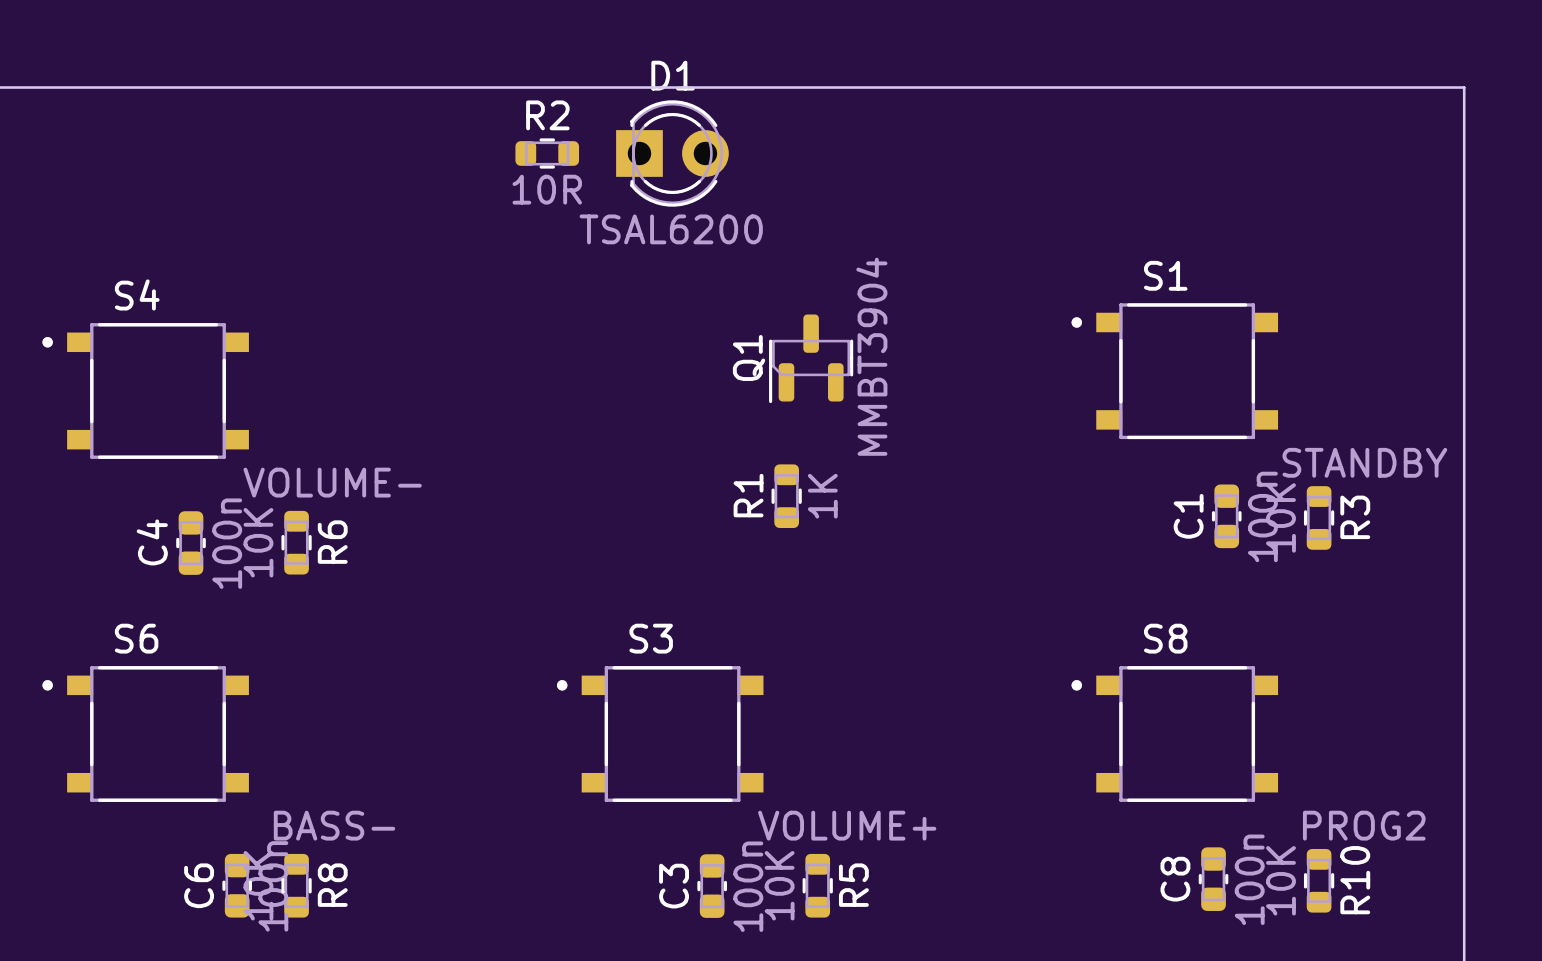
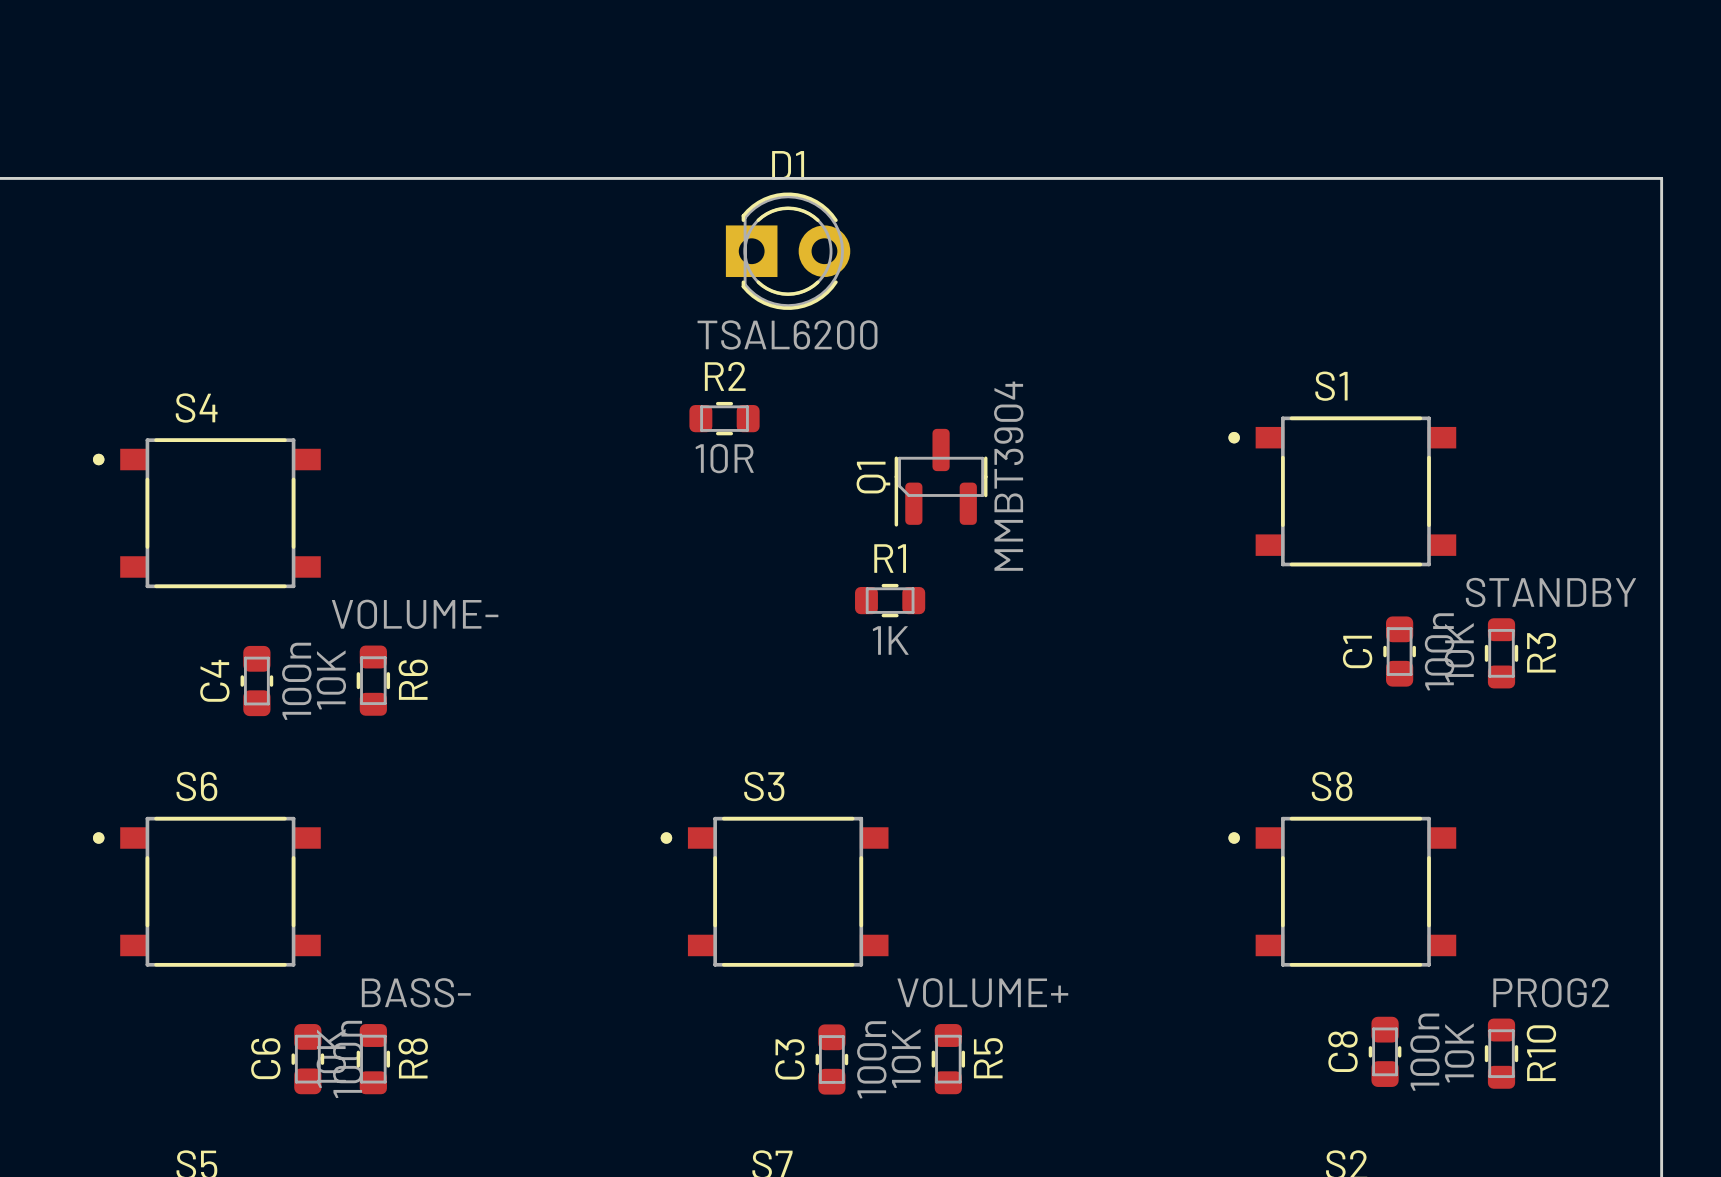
R2 position: (547, 153) -> (724, 418)
R1 rotation: 0° (786, 496) -> 90° clockwise (890, 600)

